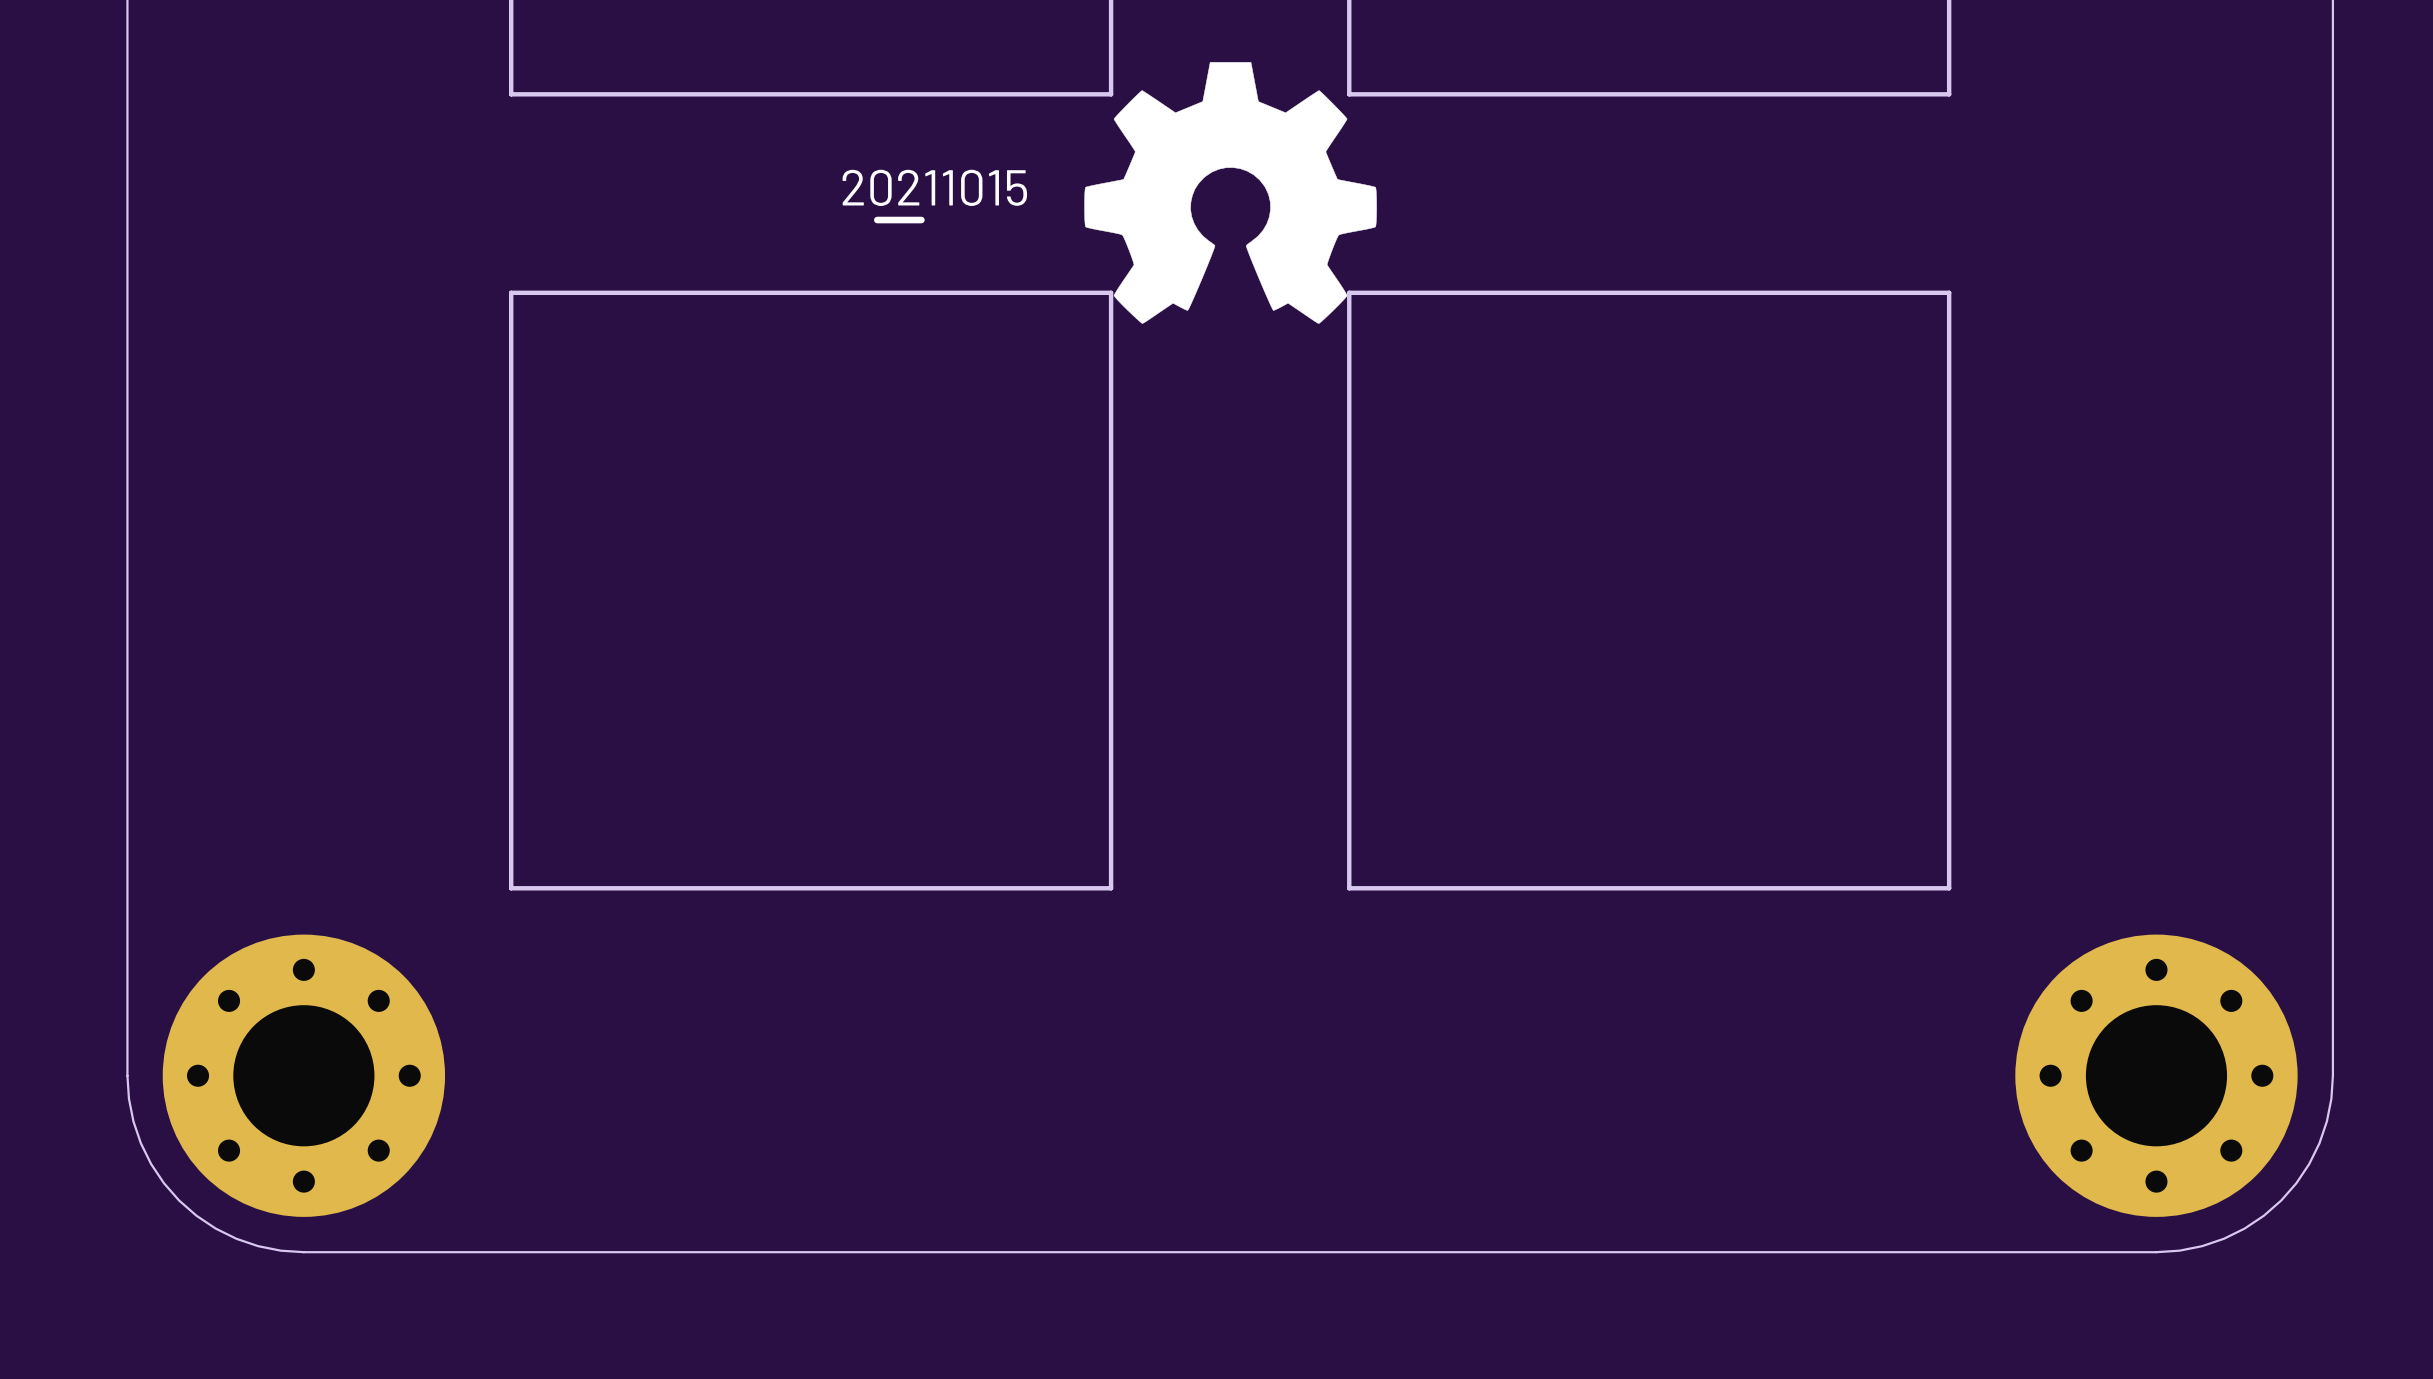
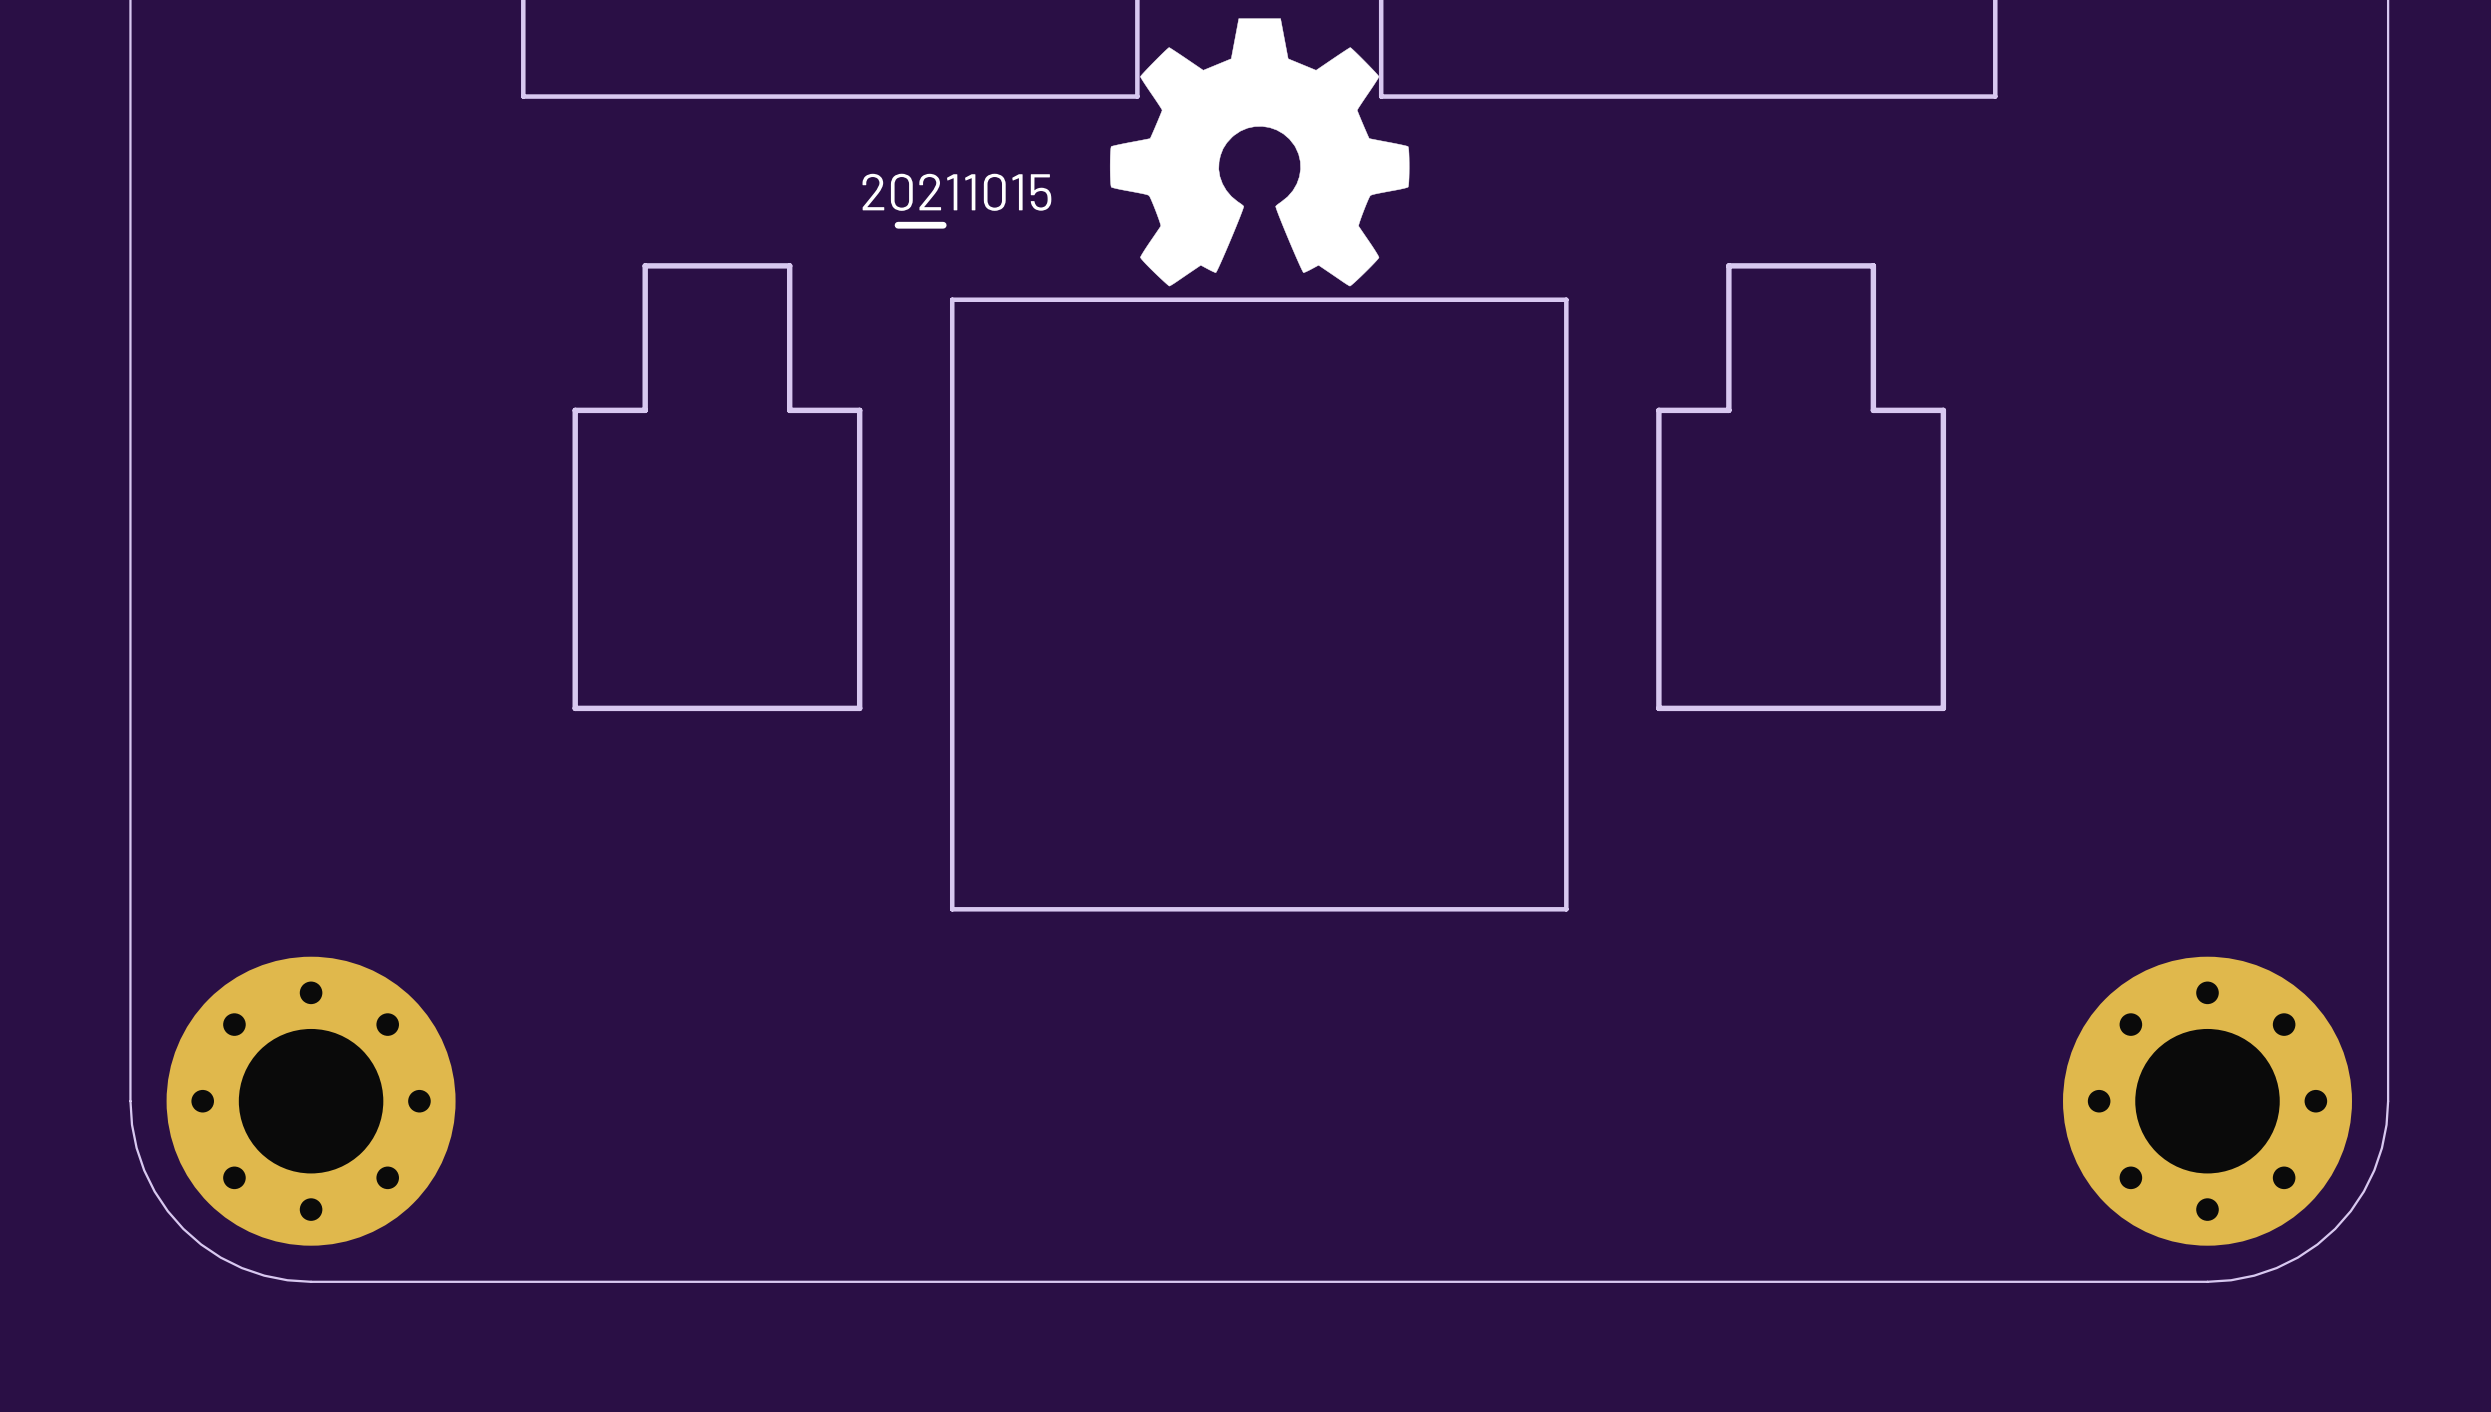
drawing position: (1230, 192) -> (1259, 152)
drawing: none -> [572, 263, 1947, 912]
drawing: [508, 290, 1114, 891] -> none
drawing: [1347, 290, 1952, 891] -> none

